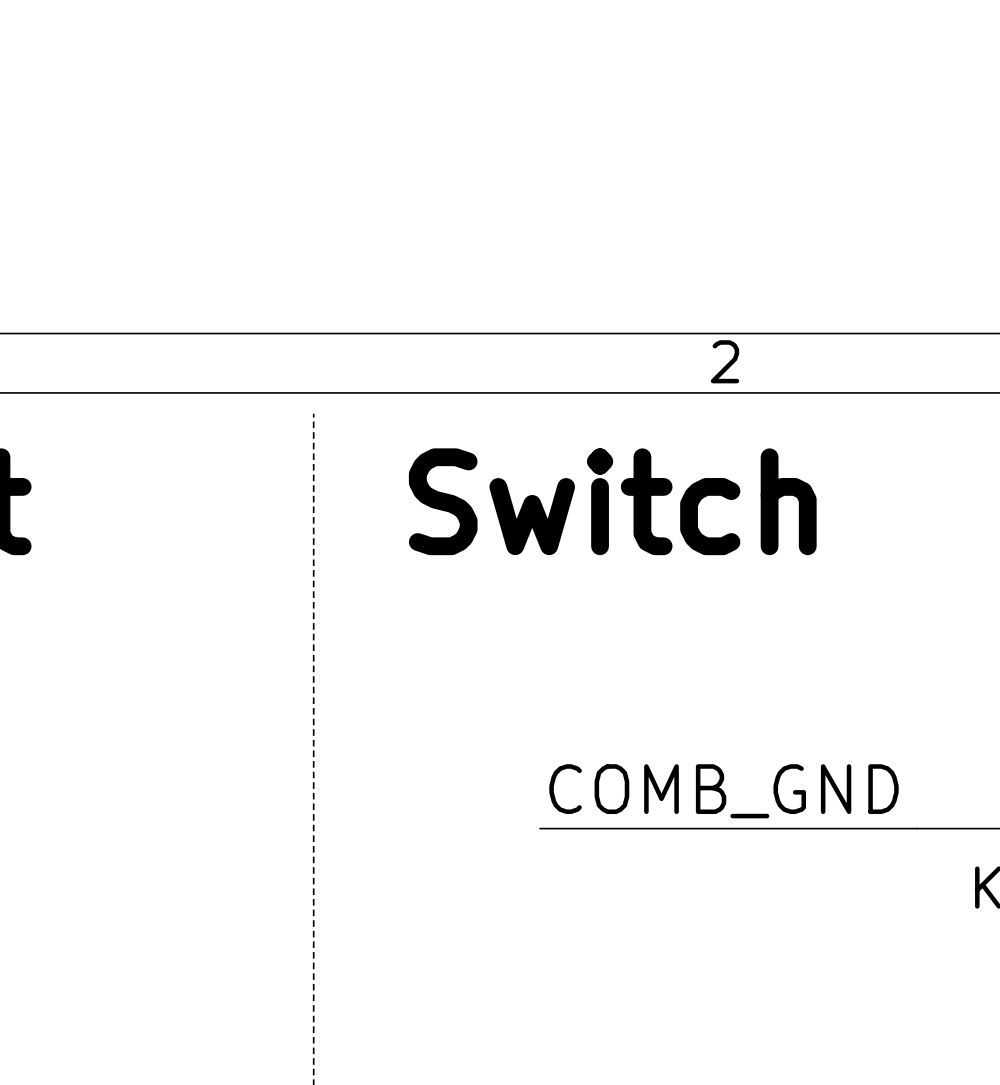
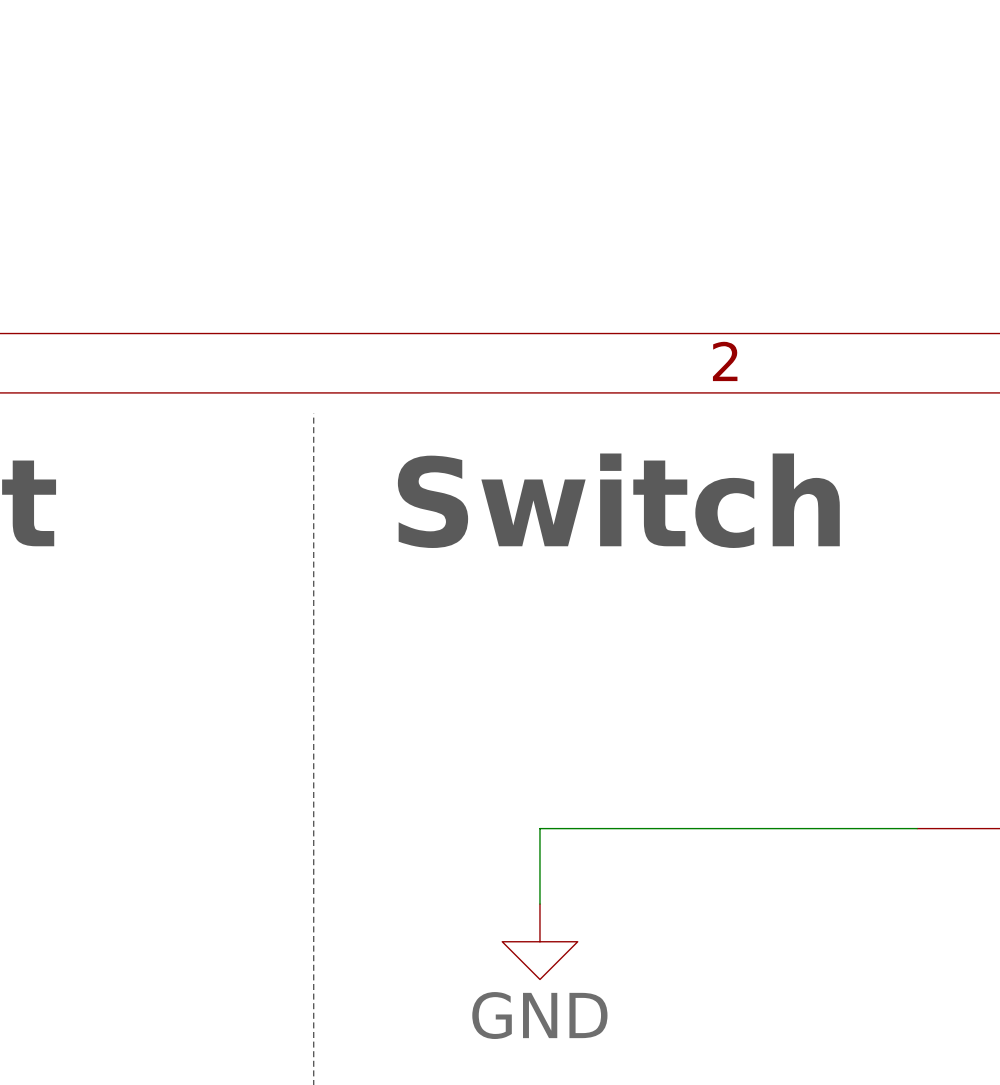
label: COMB_GND (724, 791) -> none
wire: none -> (539, 828) (539, 904)
power symbol: none -> GND (539, 941)

